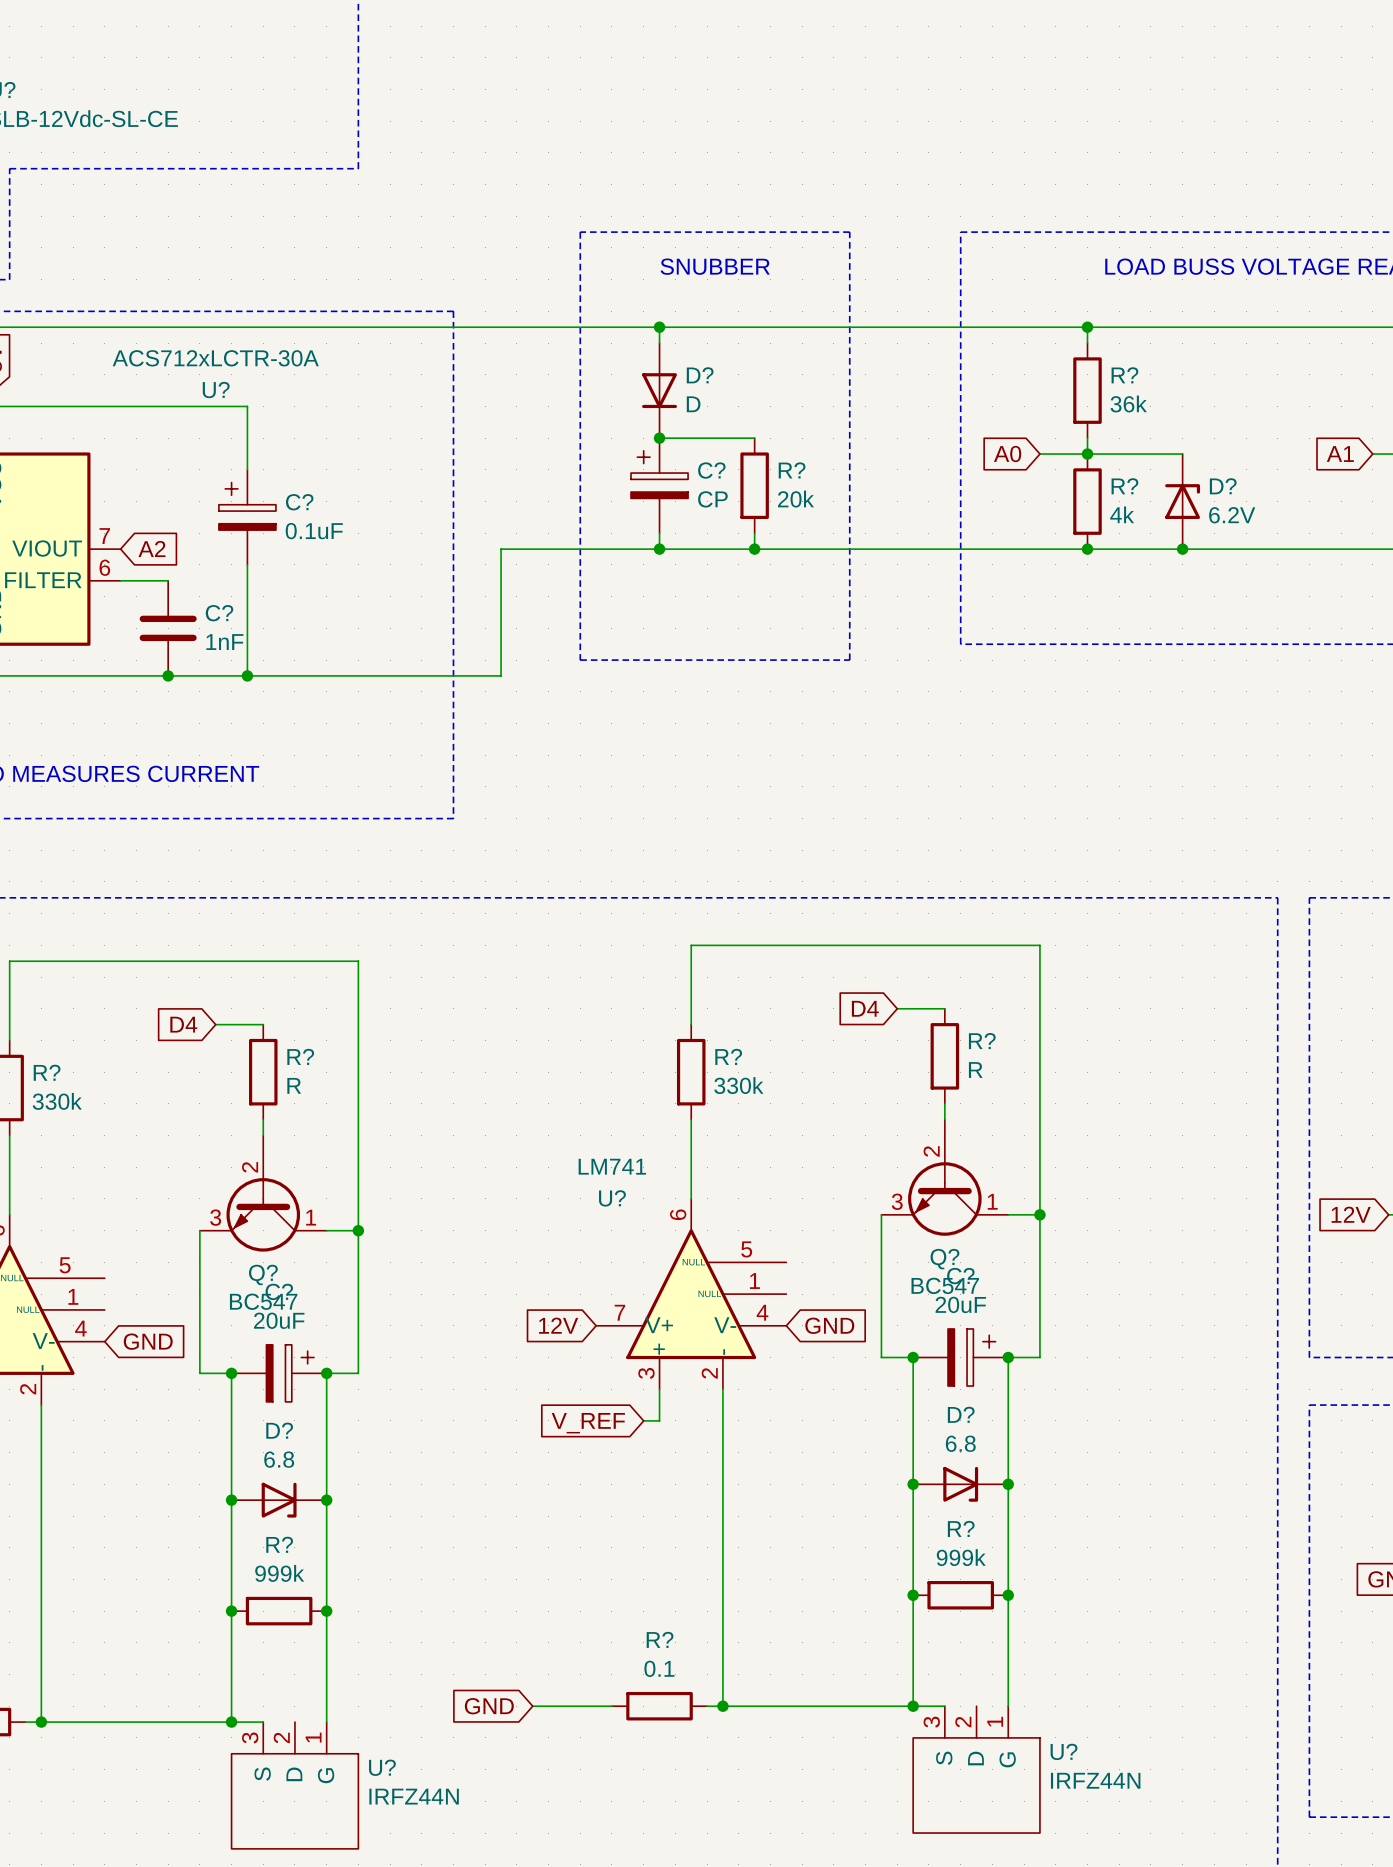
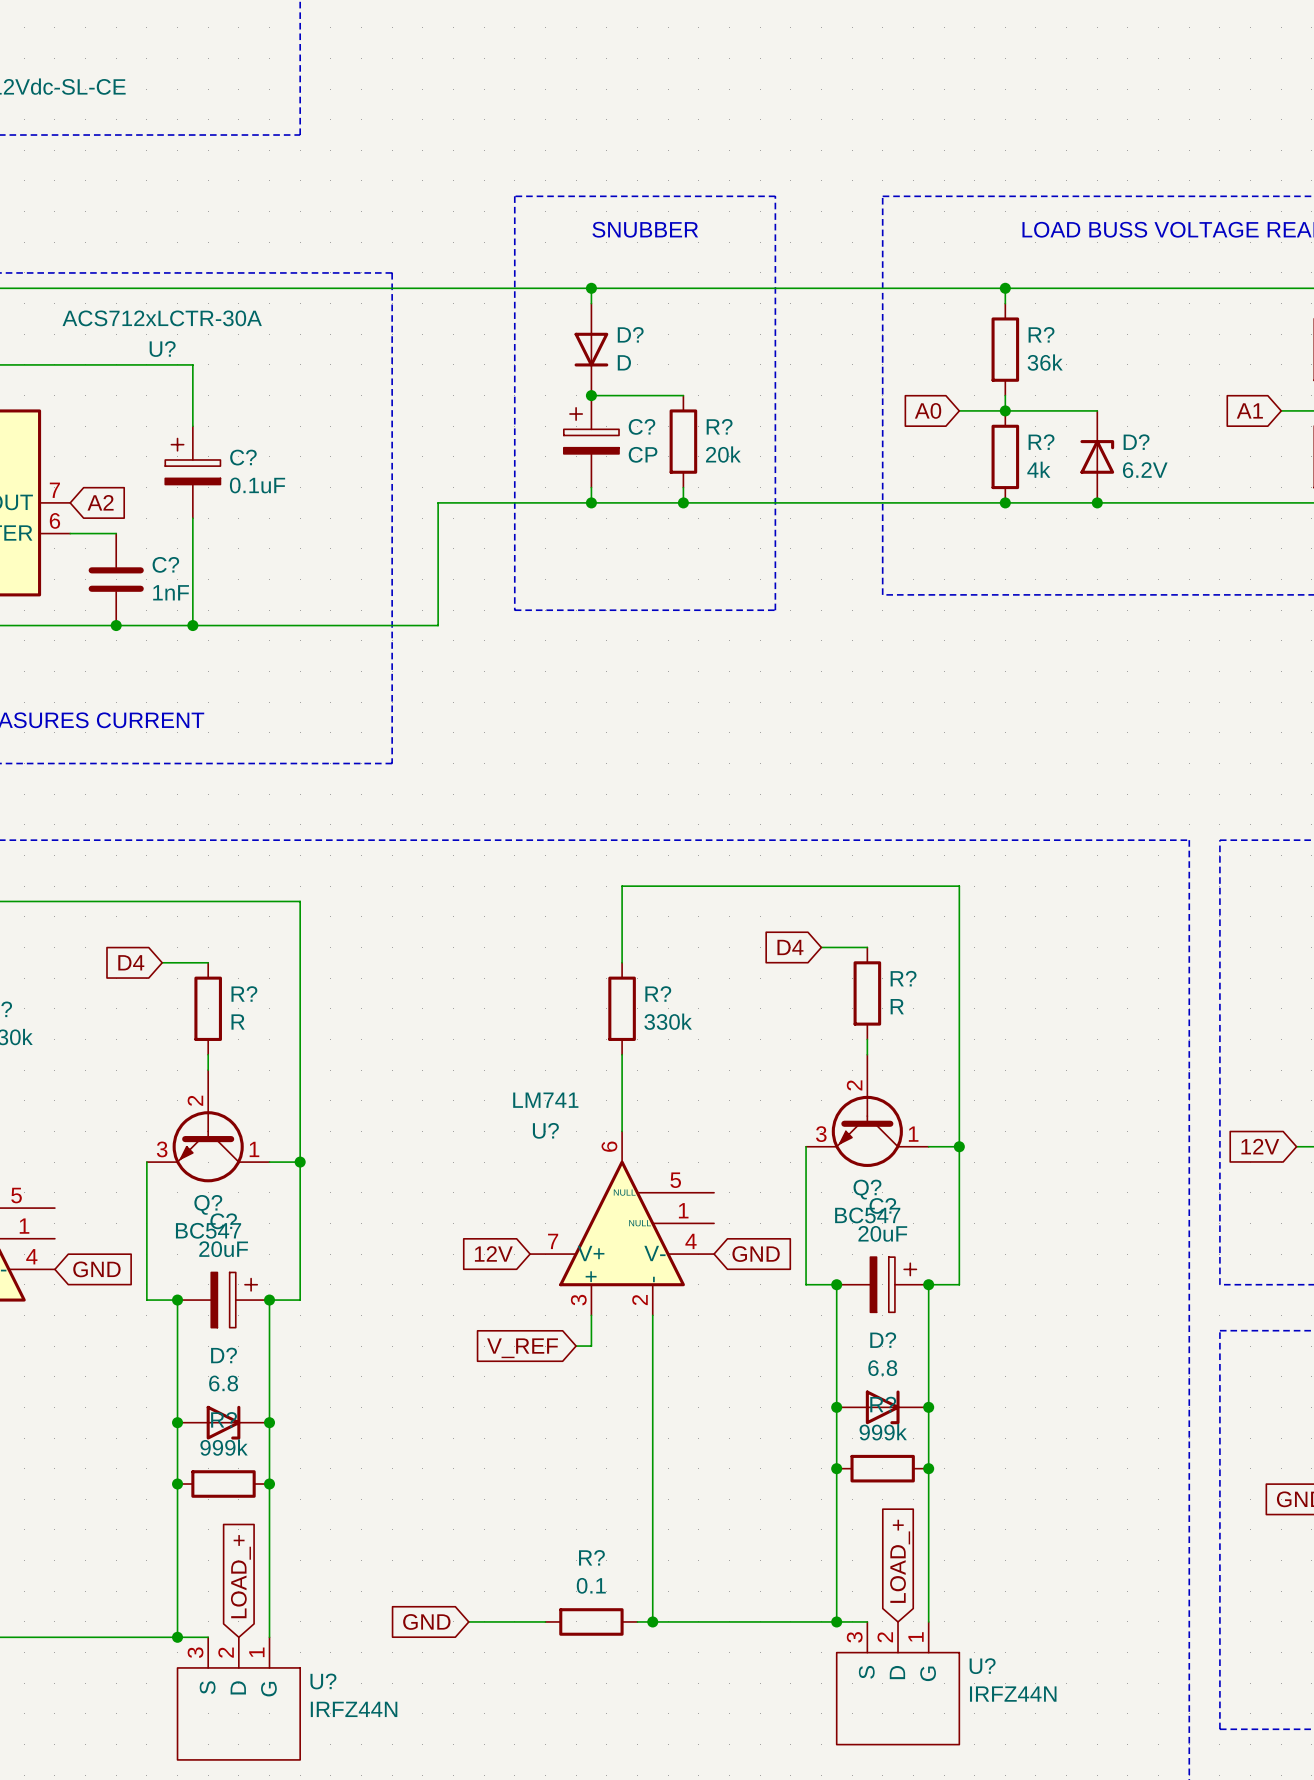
junction position: (913, 1595) -> (836, 1468)
R? position: (960, 1595) -> (882, 1468)
junction position: (1008, 1595) -> (928, 1468)
junction position: (231, 1611) -> (177, 1484)
R? position: (279, 1611) -> (223, 1484)
junction position: (326, 1611) -> (269, 1484)
global label: none -> LOAD_+ (900, 1561)
global label: none -> LOAD_+ (240, 1576)

